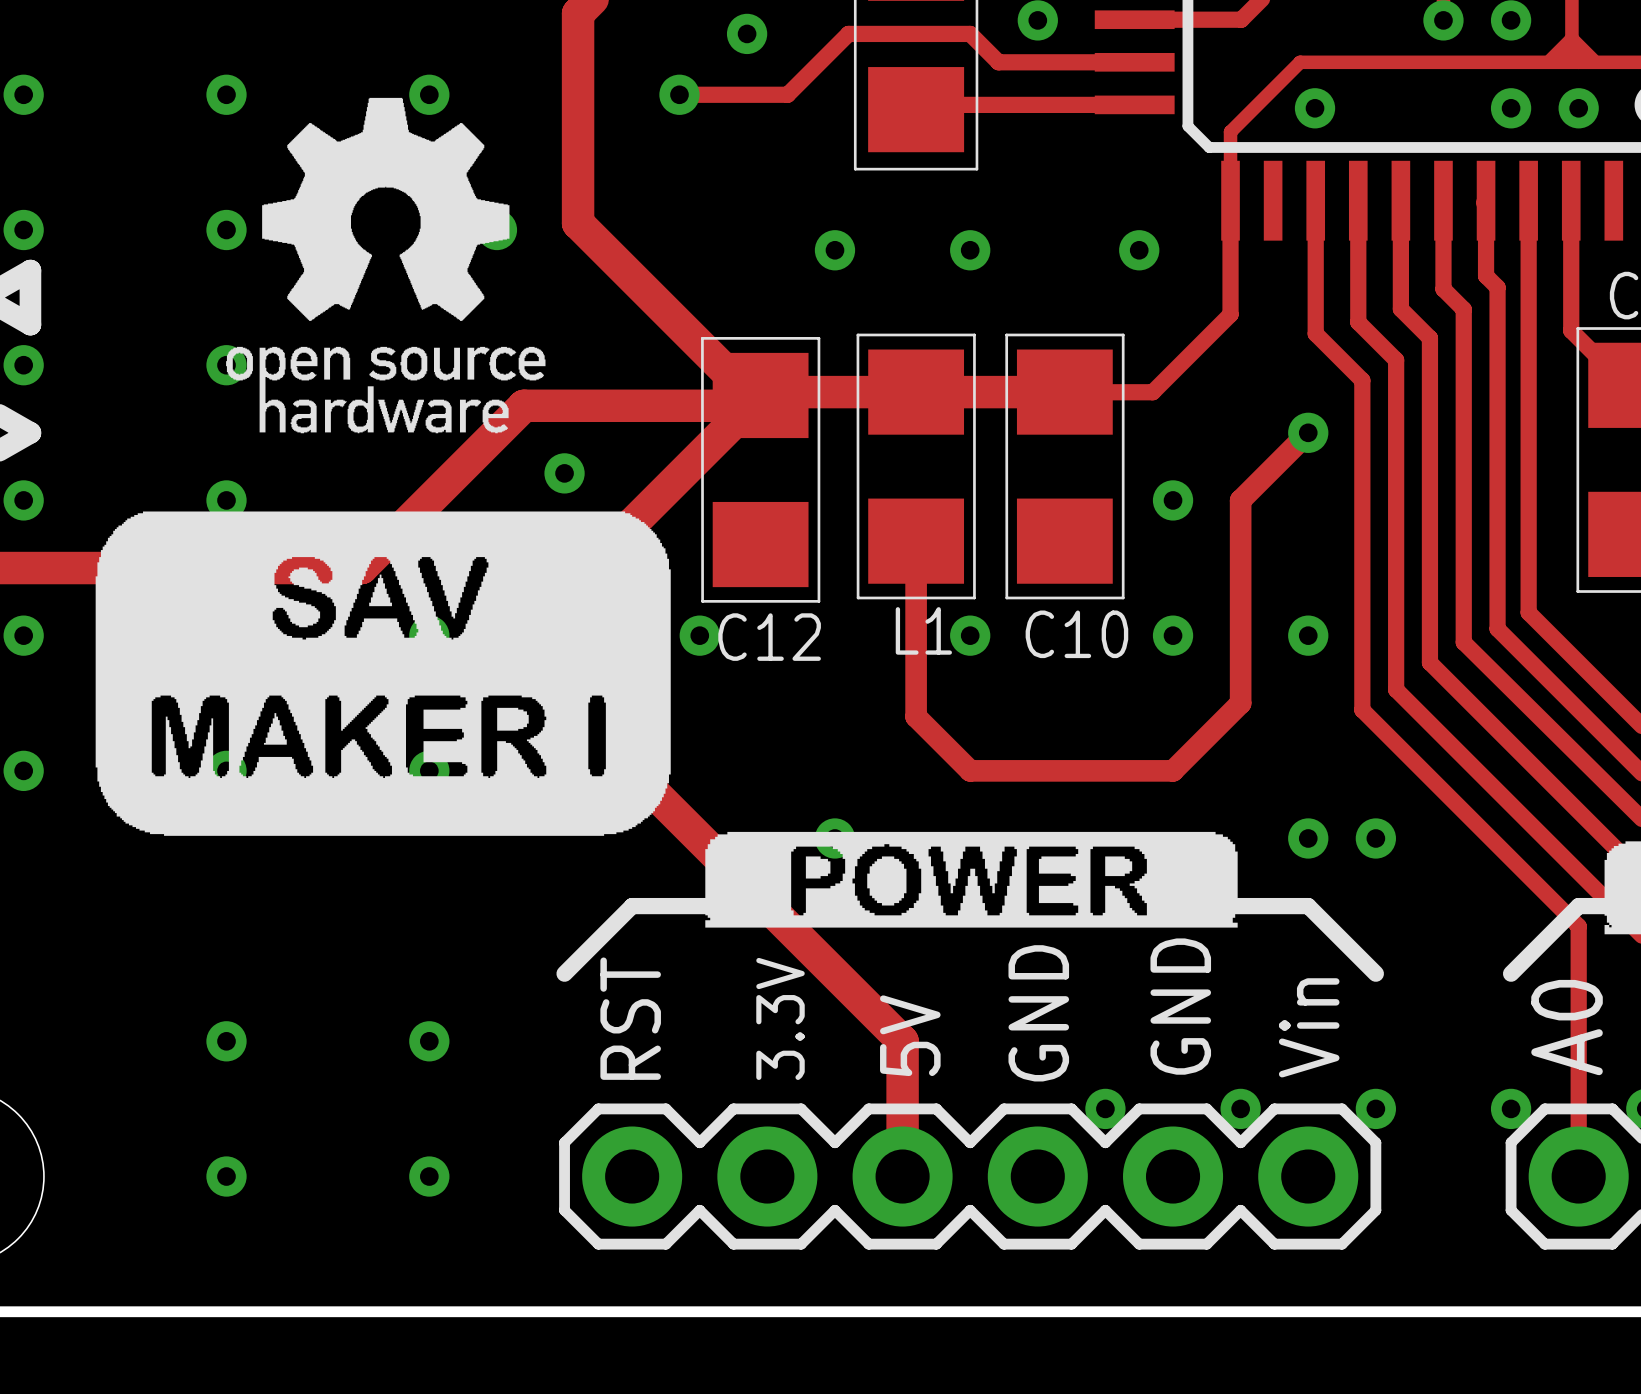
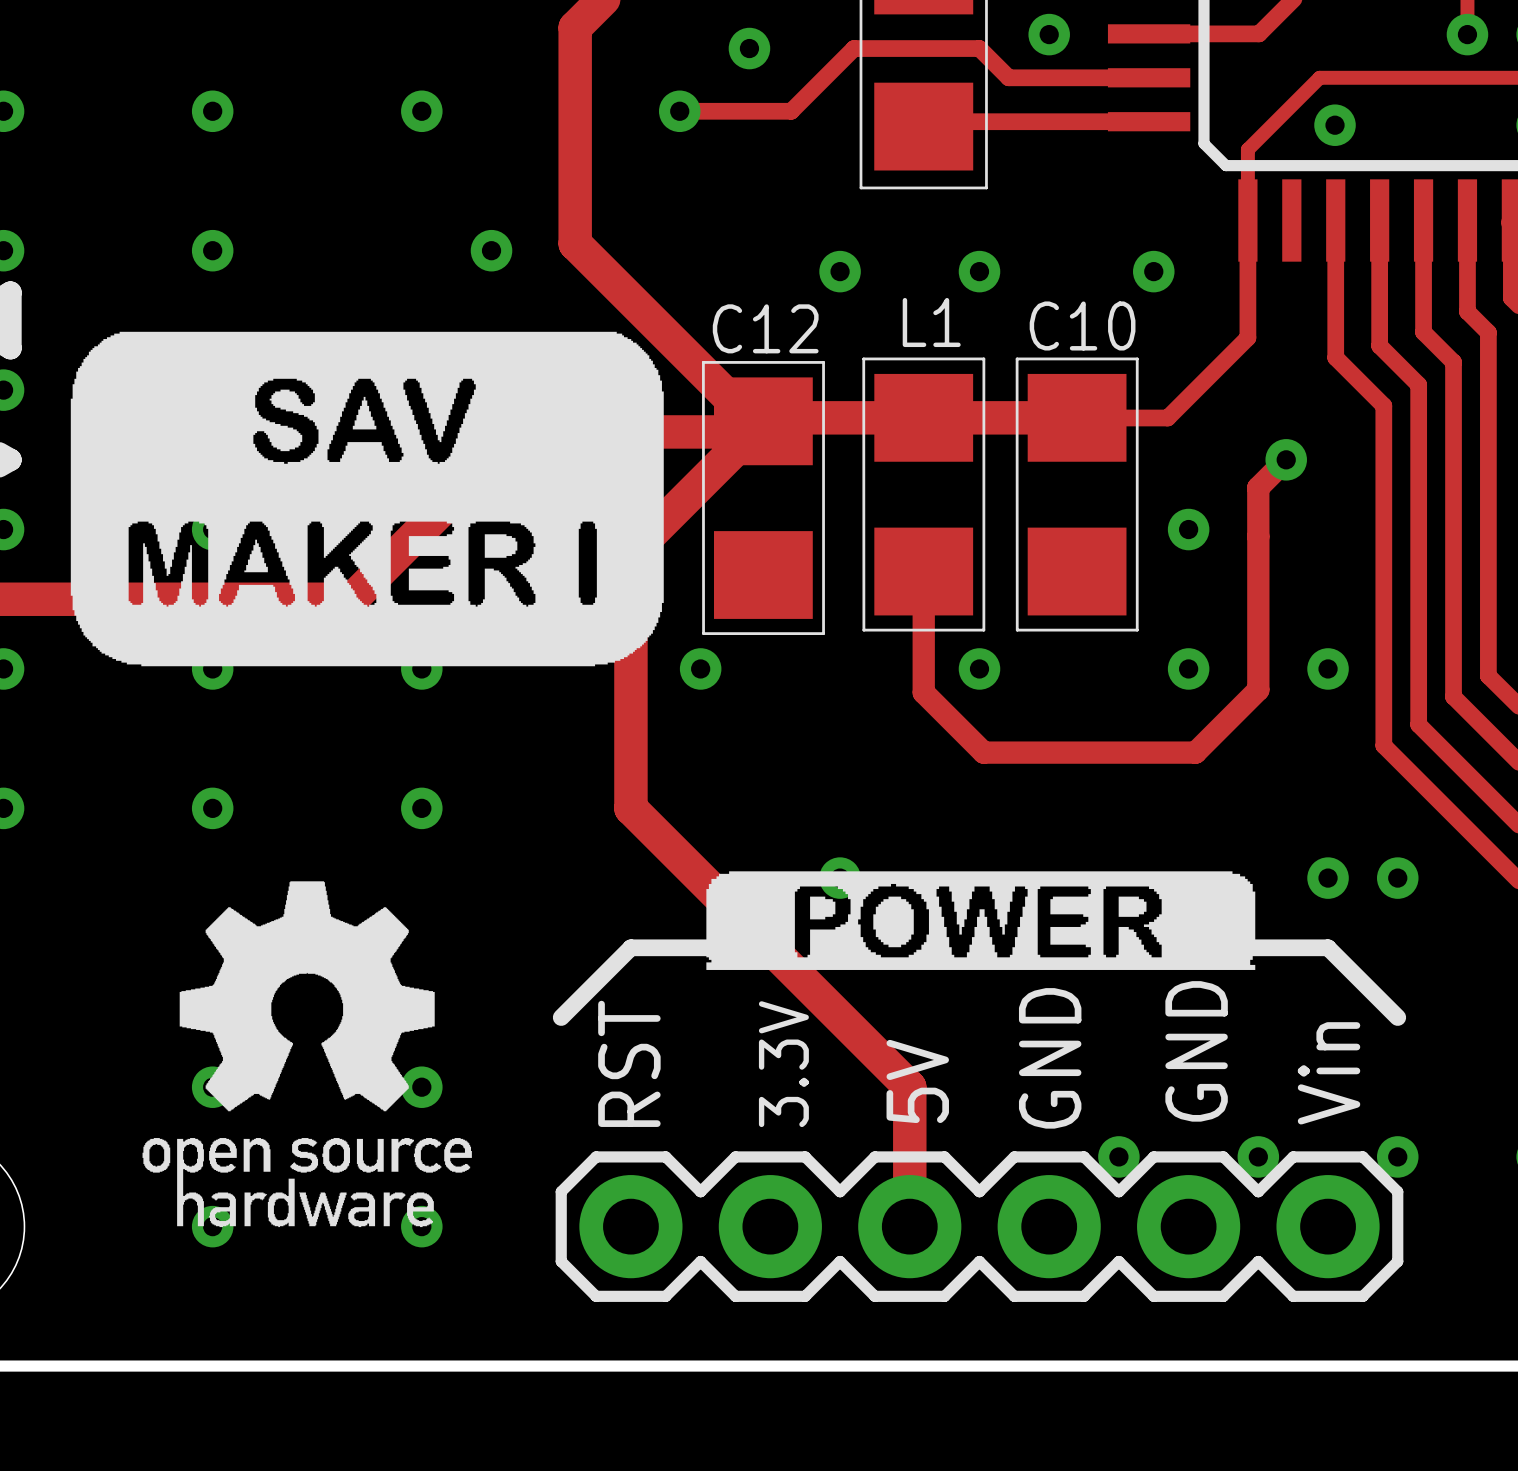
drawing position: (385, 265) -> (307, 1054)
track: (1308, 432) (1240, 500) (1240, 507) -> (1286, 459) (1258, 487) (1258, 536)
via position: (1308, 432) -> (1286, 459)
L1 name position: L1 (923, 630) -> L1 (931, 322)
C10 name position: C10 (1076, 634) -> C10 (1082, 325)
C12 name position: C12 (769, 637) -> C12 (765, 328)
track: (1240, 655) (1240, 703) (1173, 770) (970, 770) (916, 716) (916, 658) -> (1258, 689) (1195, 752) (983, 752) (923, 692)
drawing position: (383, 673) -> (367, 499)

